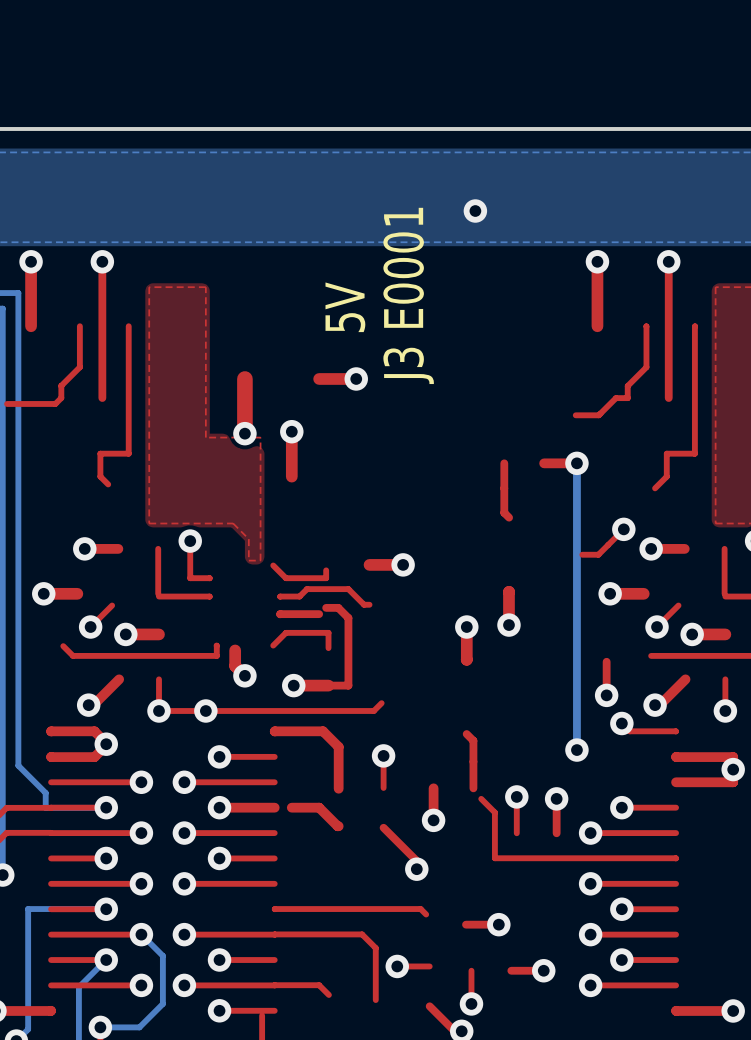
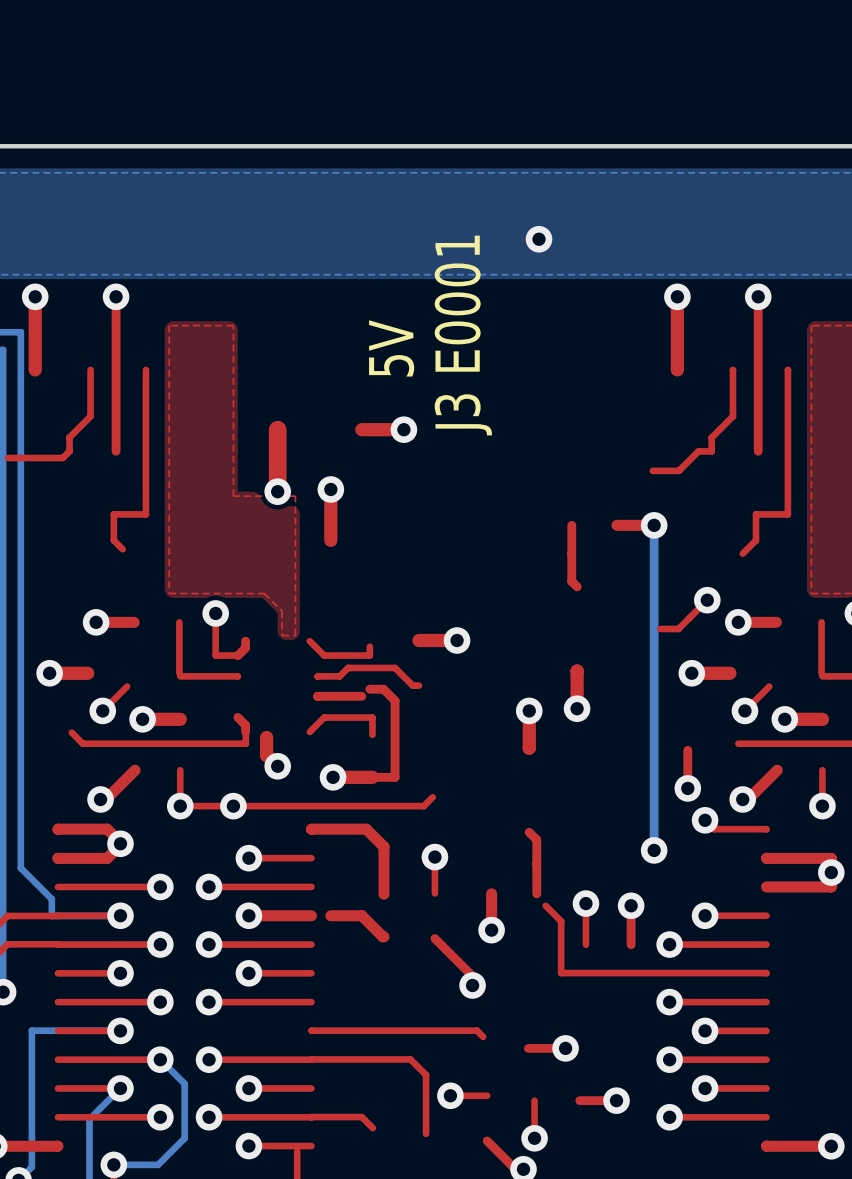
top track: none -> (245, 641) (245, 647) (237, 655)
top track: none -> (237, 717) (245, 725) (245, 731)

